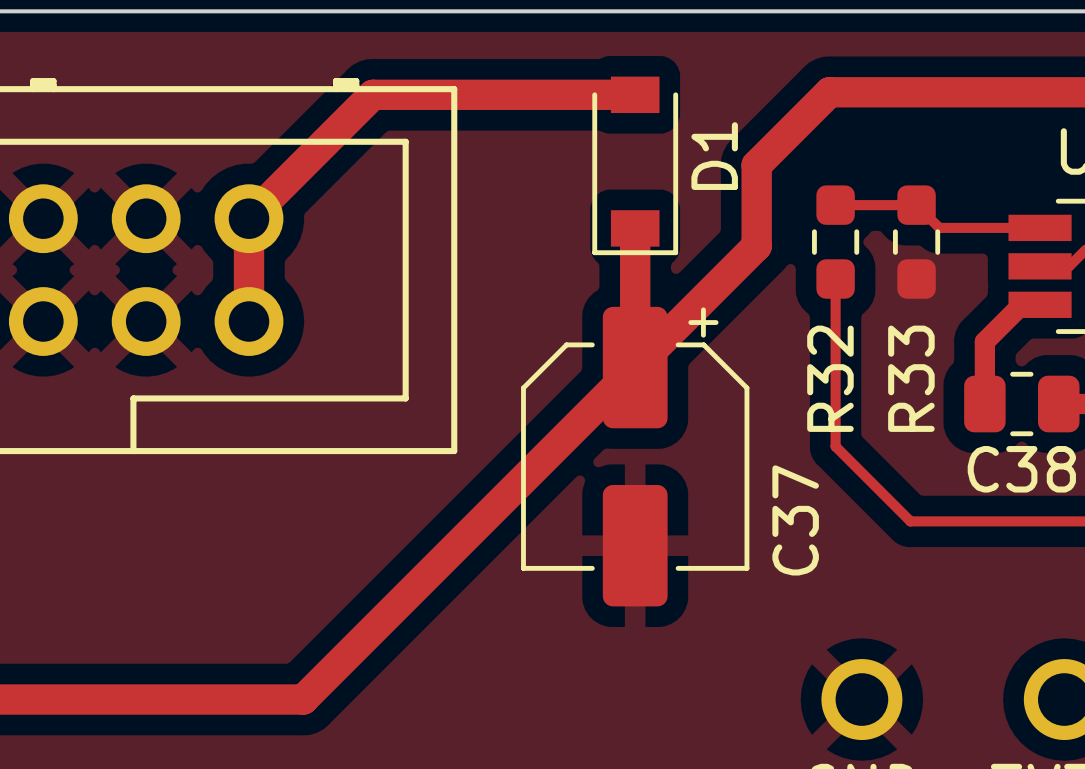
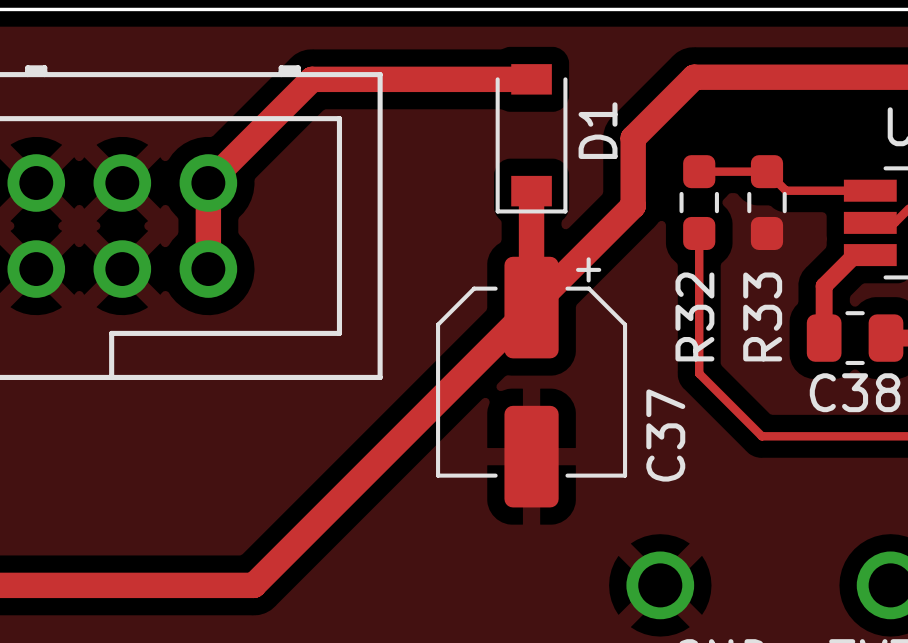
part position: (861, 699) -> (660, 585)

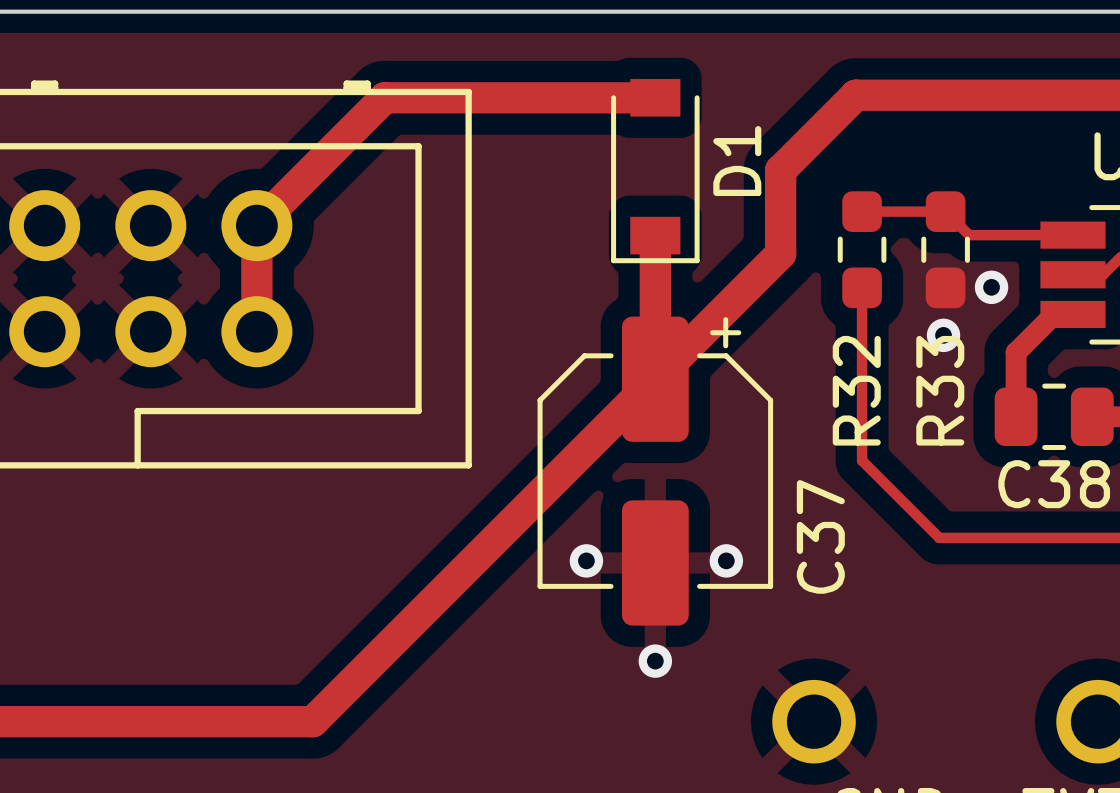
via: none -> (991, 287)
via: none -> (943, 335)
via: none -> (586, 560)
via: none -> (726, 560)
via: none -> (655, 661)

